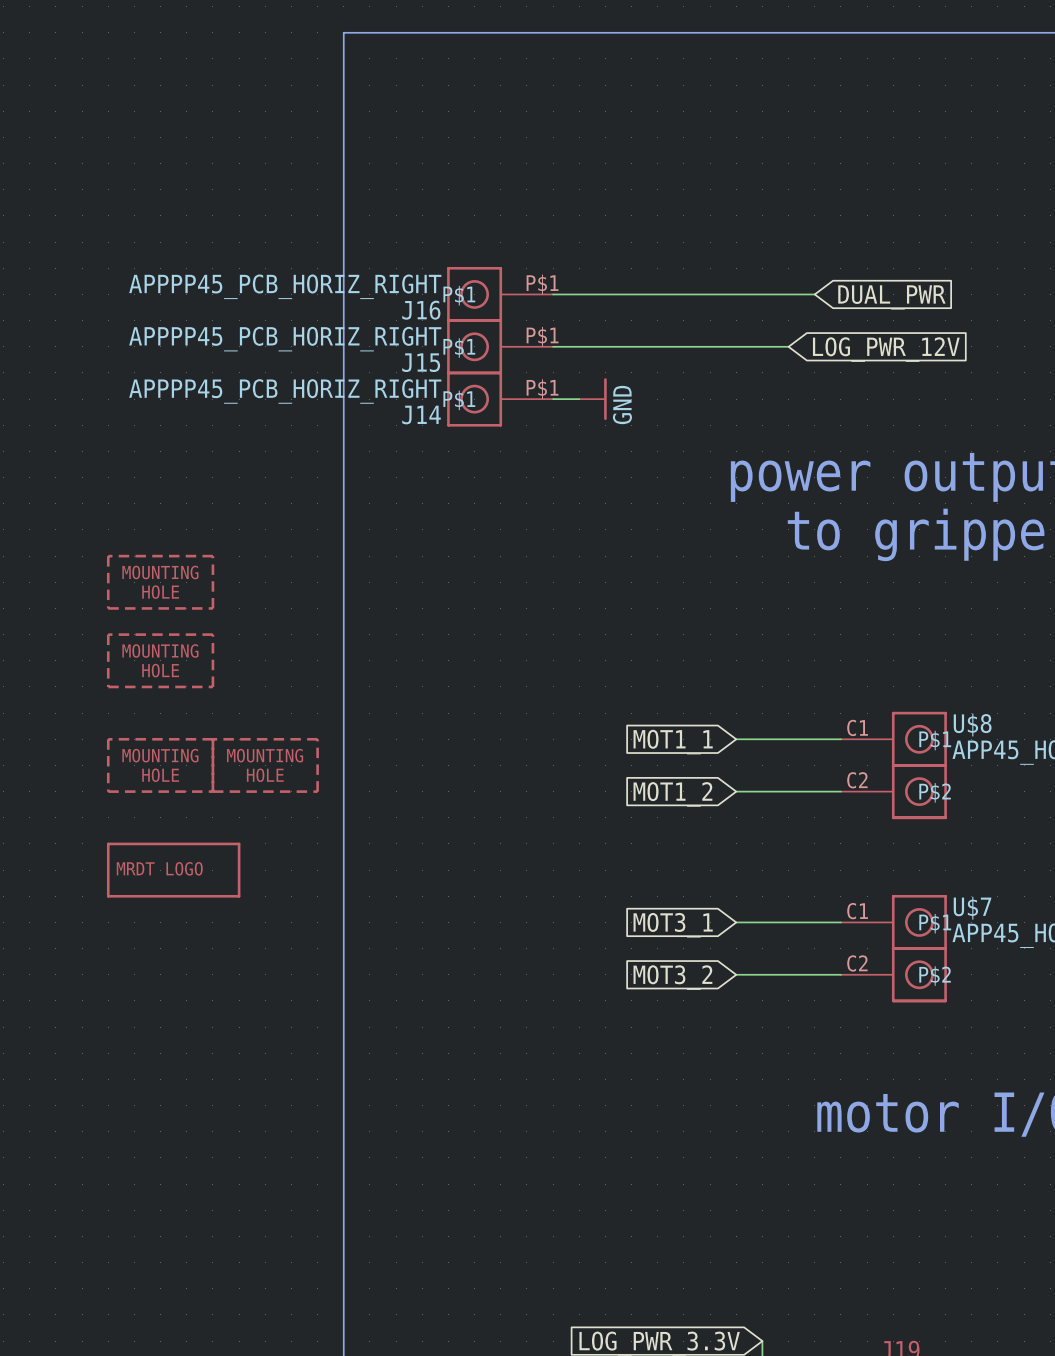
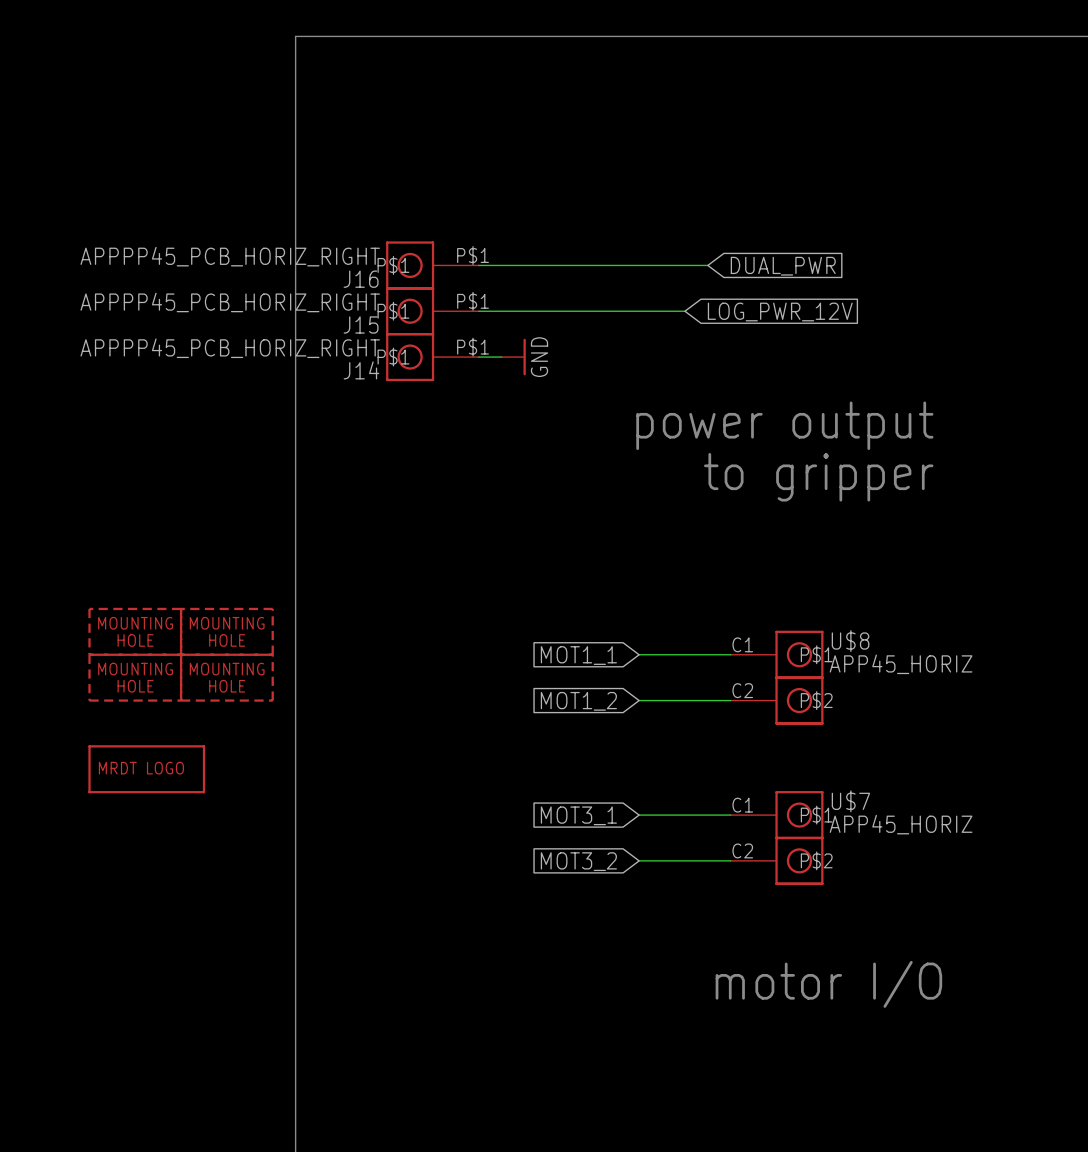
part: (160, 582) -> none
part position: (160, 660) -> (135, 631)
part: none -> (226, 631)

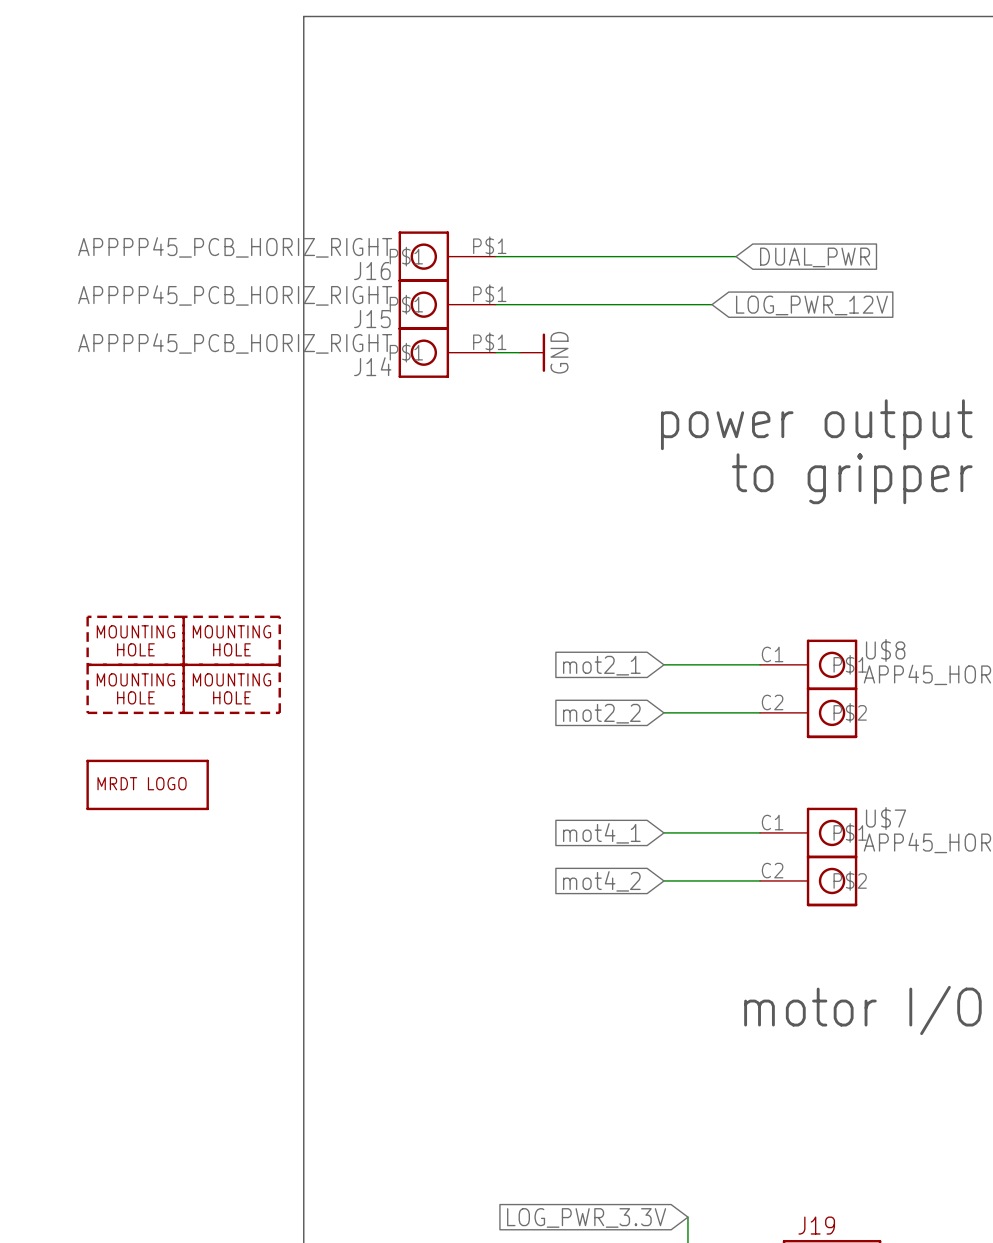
global label: MOT1_1 (578, 655) -> mot2_1 (601, 665)
global label: MOT1_2 (578, 701) -> mot2_2 (601, 713)
global label: MOT3_1 (578, 815) -> mot4_1 (601, 833)
global label: MOT3_2 (578, 861) -> mot4_2 (601, 881)

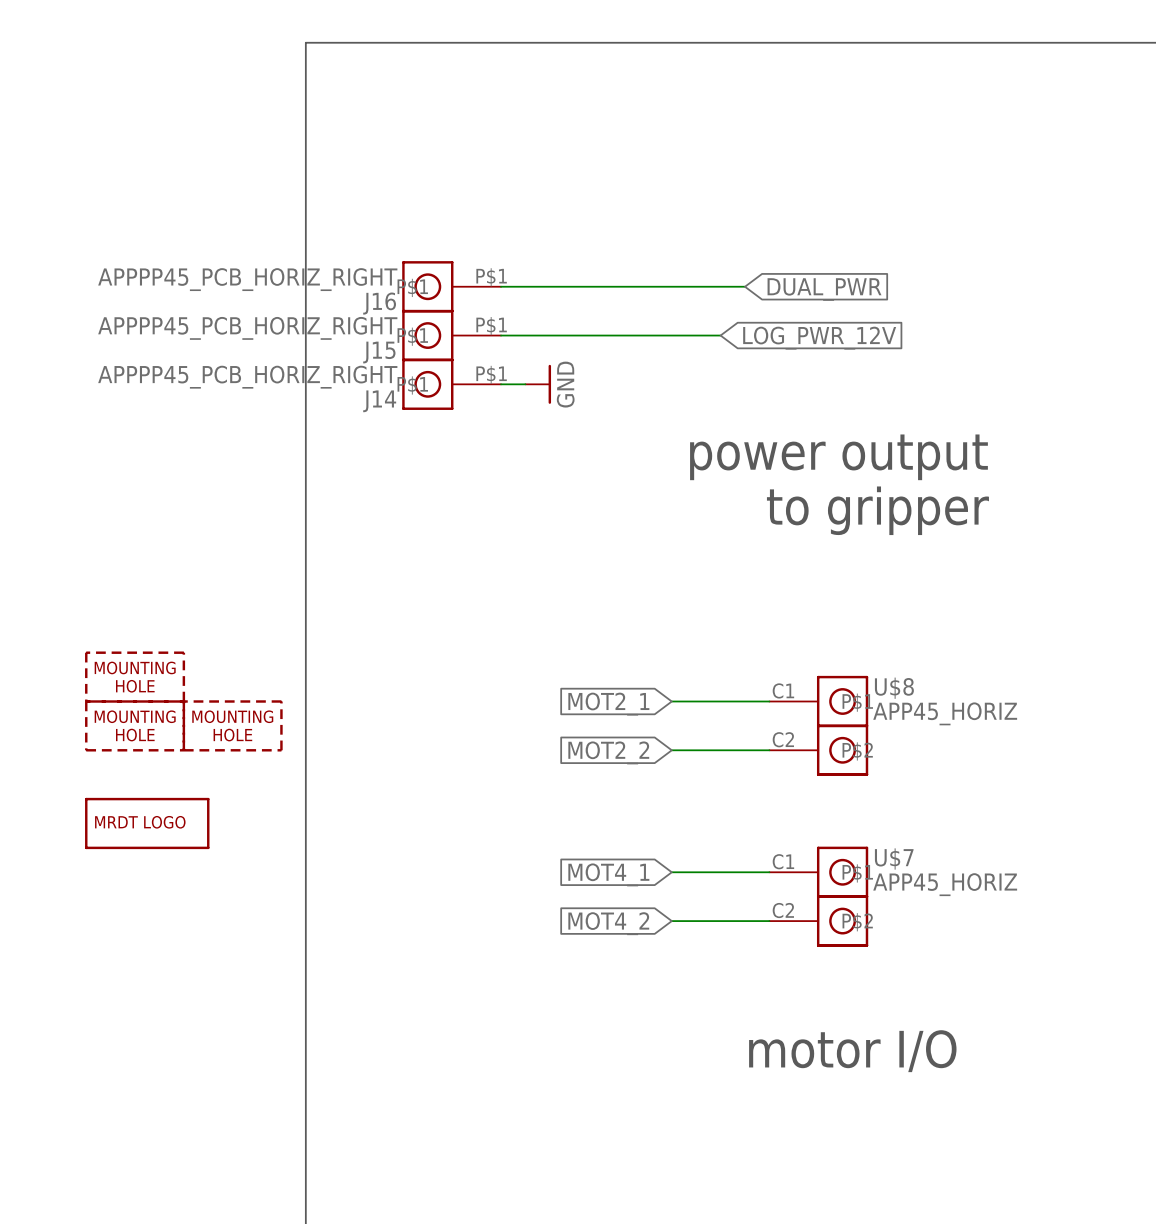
part: (231, 640) -> none
global label: mot2_1 (601, 665) -> MOT2_1 (608, 704)
global label: mot2_2 (601, 713) -> MOT2_2 (608, 752)
global label: mot4_1 (601, 833) -> MOT4_1 (608, 874)
global label: mot4_2 (601, 881) -> MOT4_2 (608, 923)

